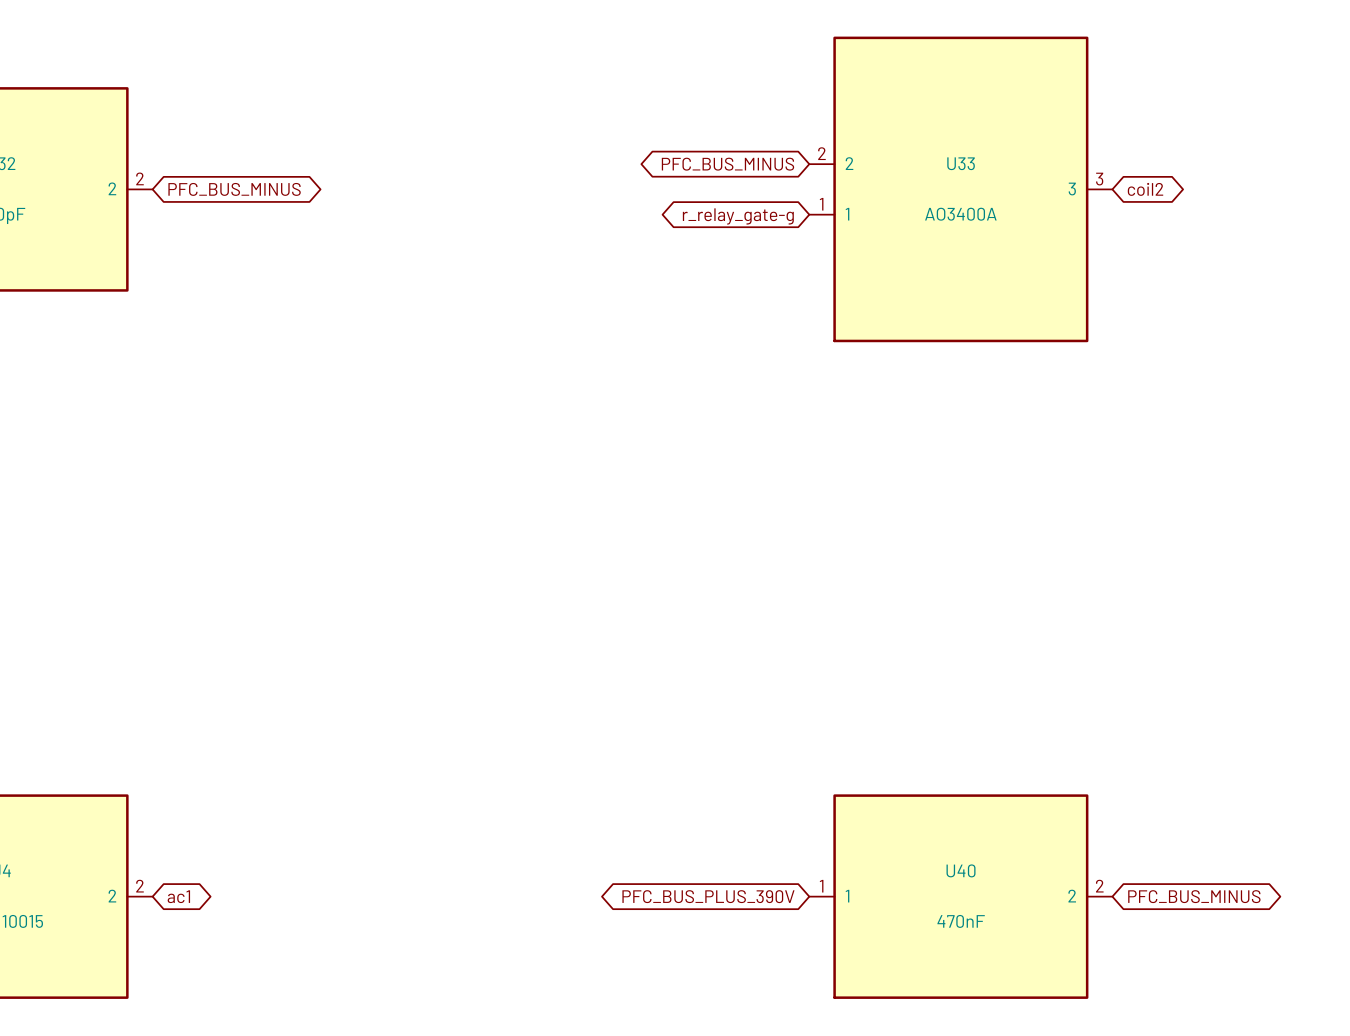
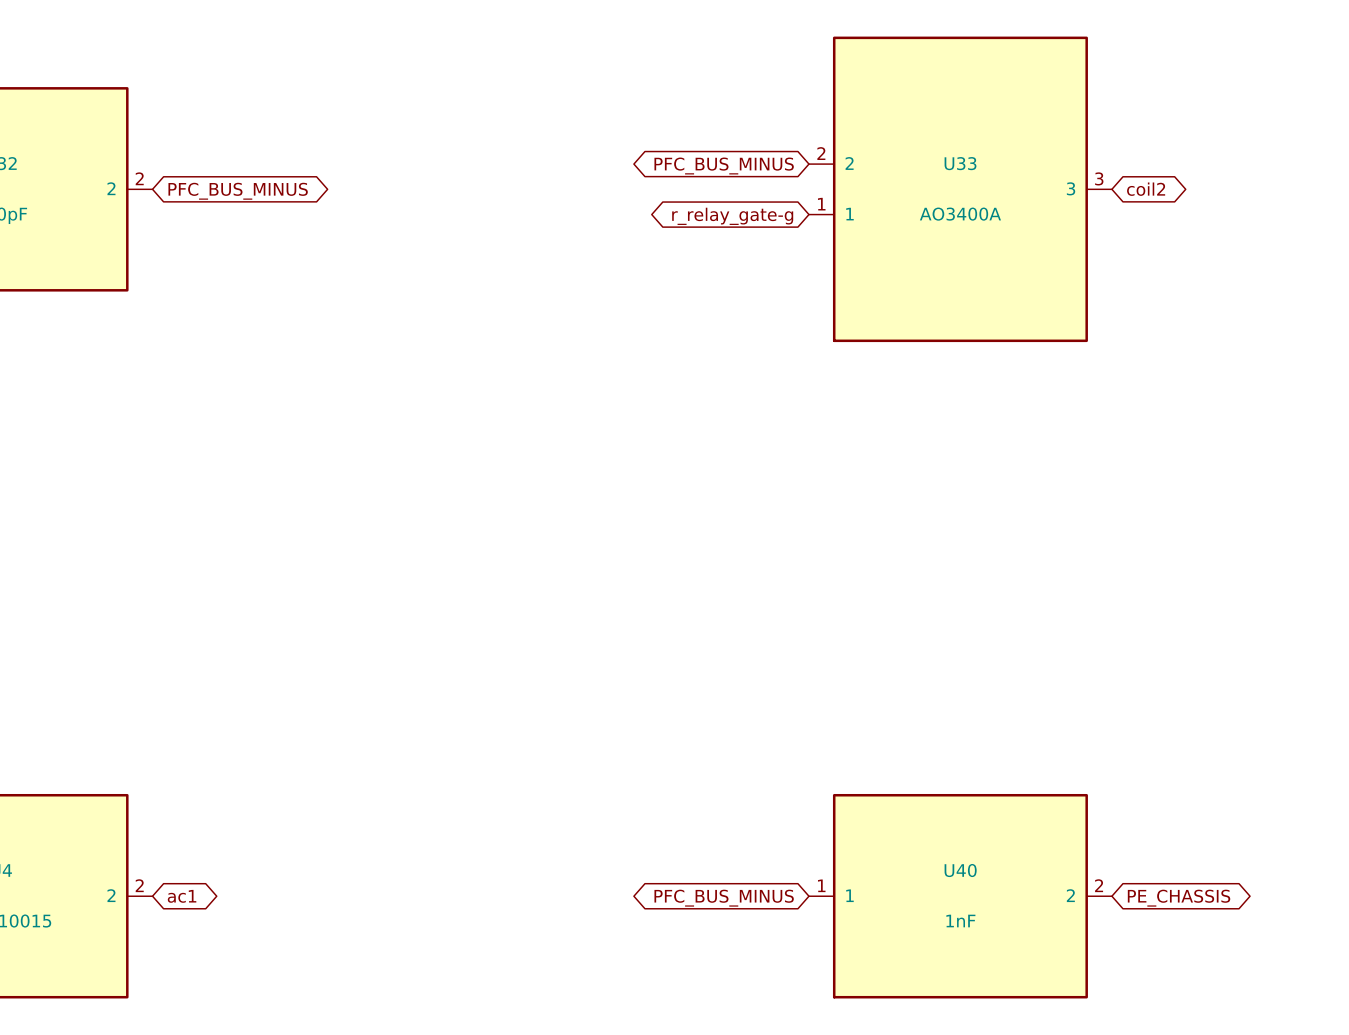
global label: PFC_BUS_PLUS_390V (708, 896) -> PFC_BUS_MINUS (724, 898)
global label: PFC_BUS_MINUS (1194, 896) -> PE_CHASSIS (1179, 898)
U40 value: 470nF (961, 921) -> 1nF (960, 921)

